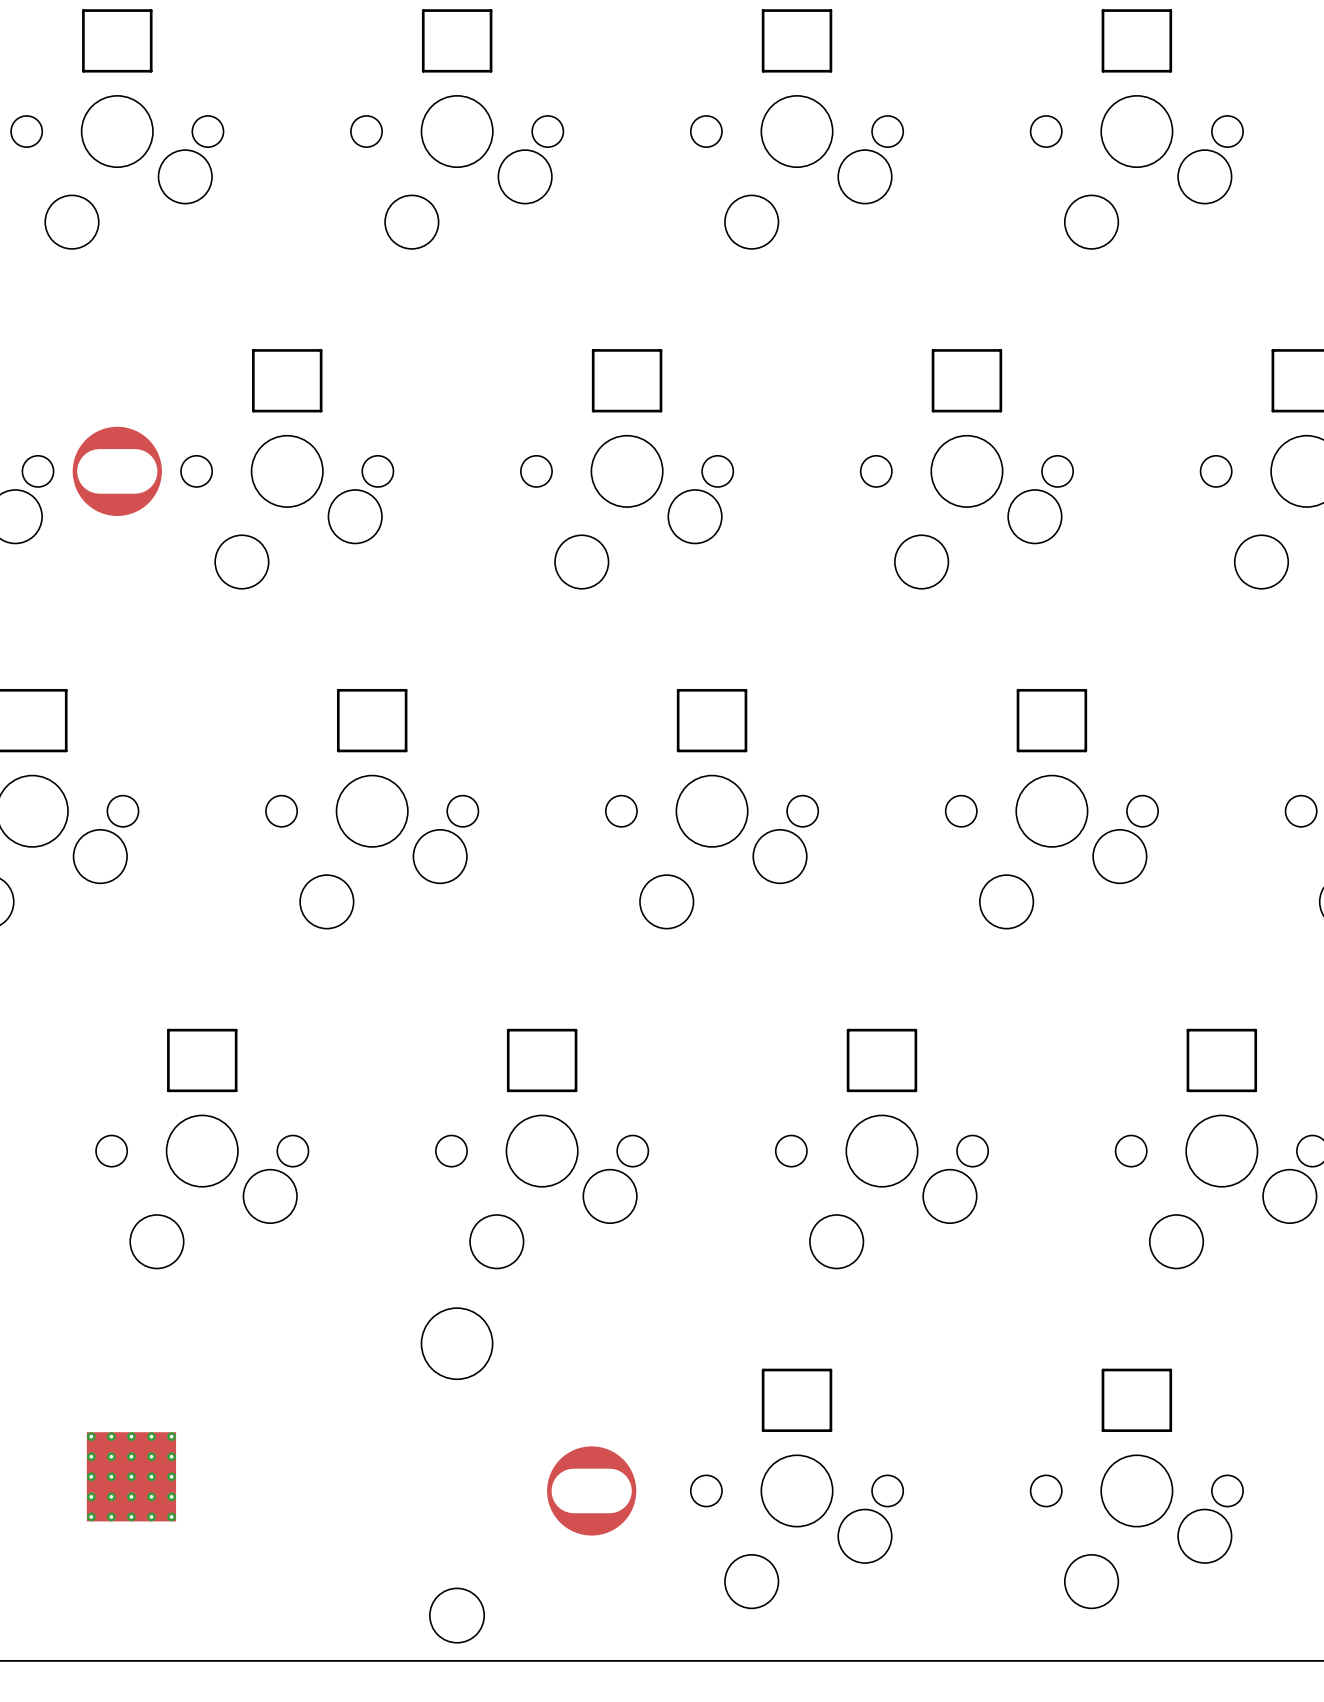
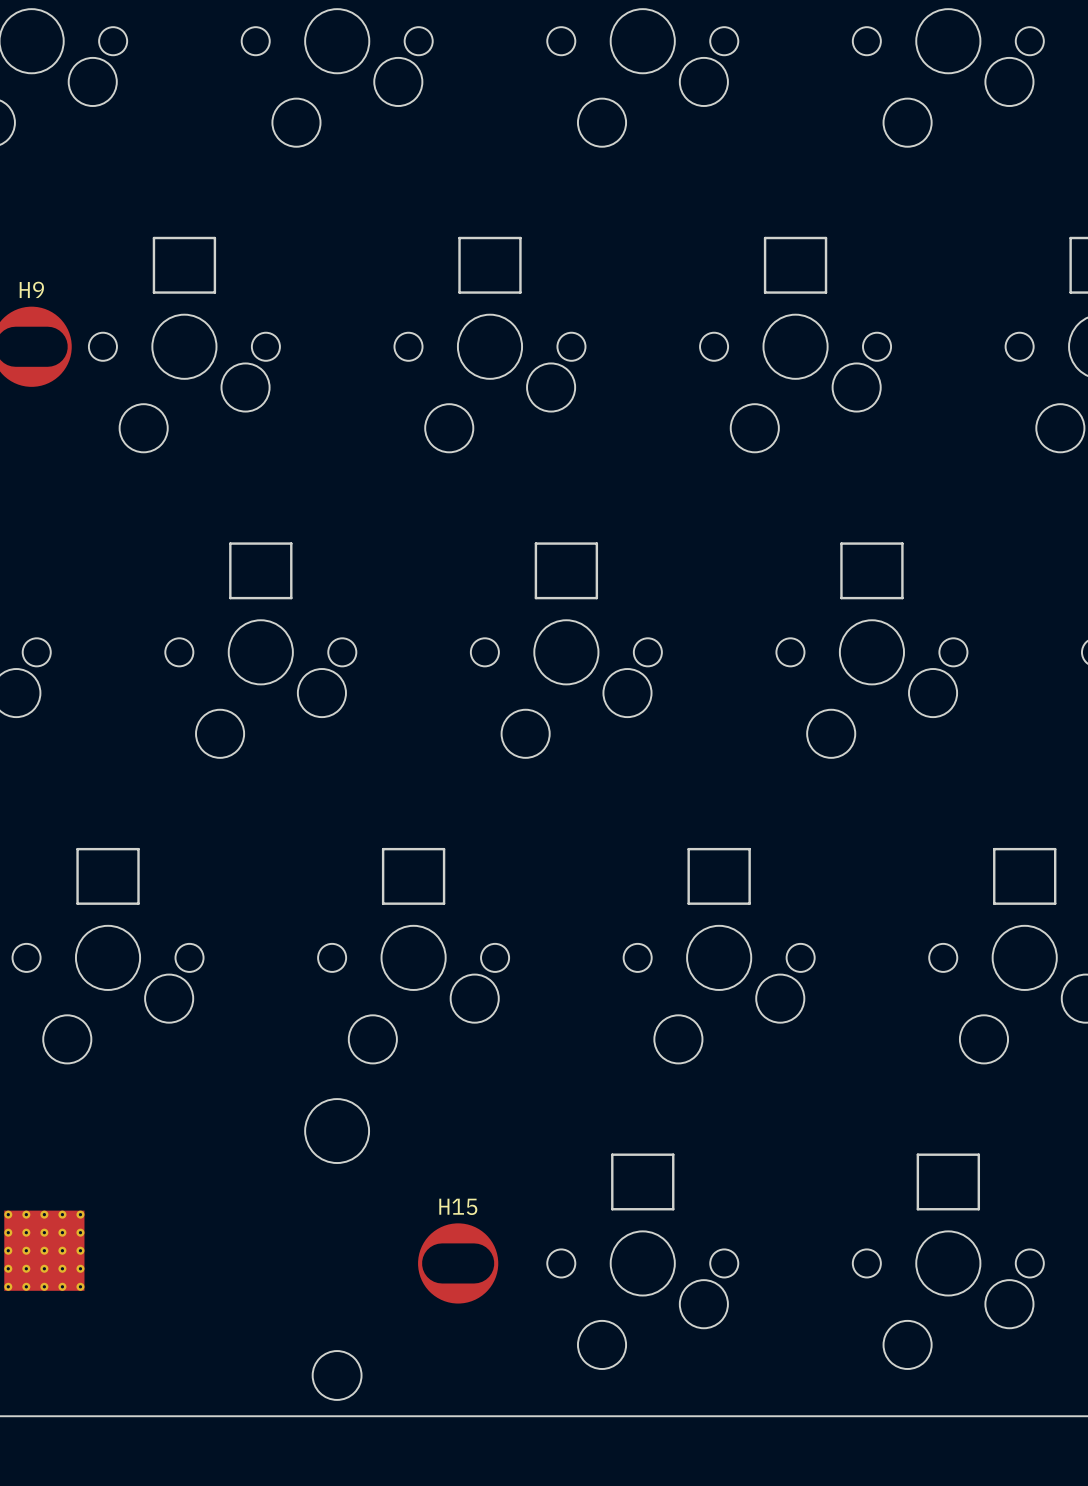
H9 name: none -> H9 (31, 289)
H15 name: none -> H15 (458, 1206)

